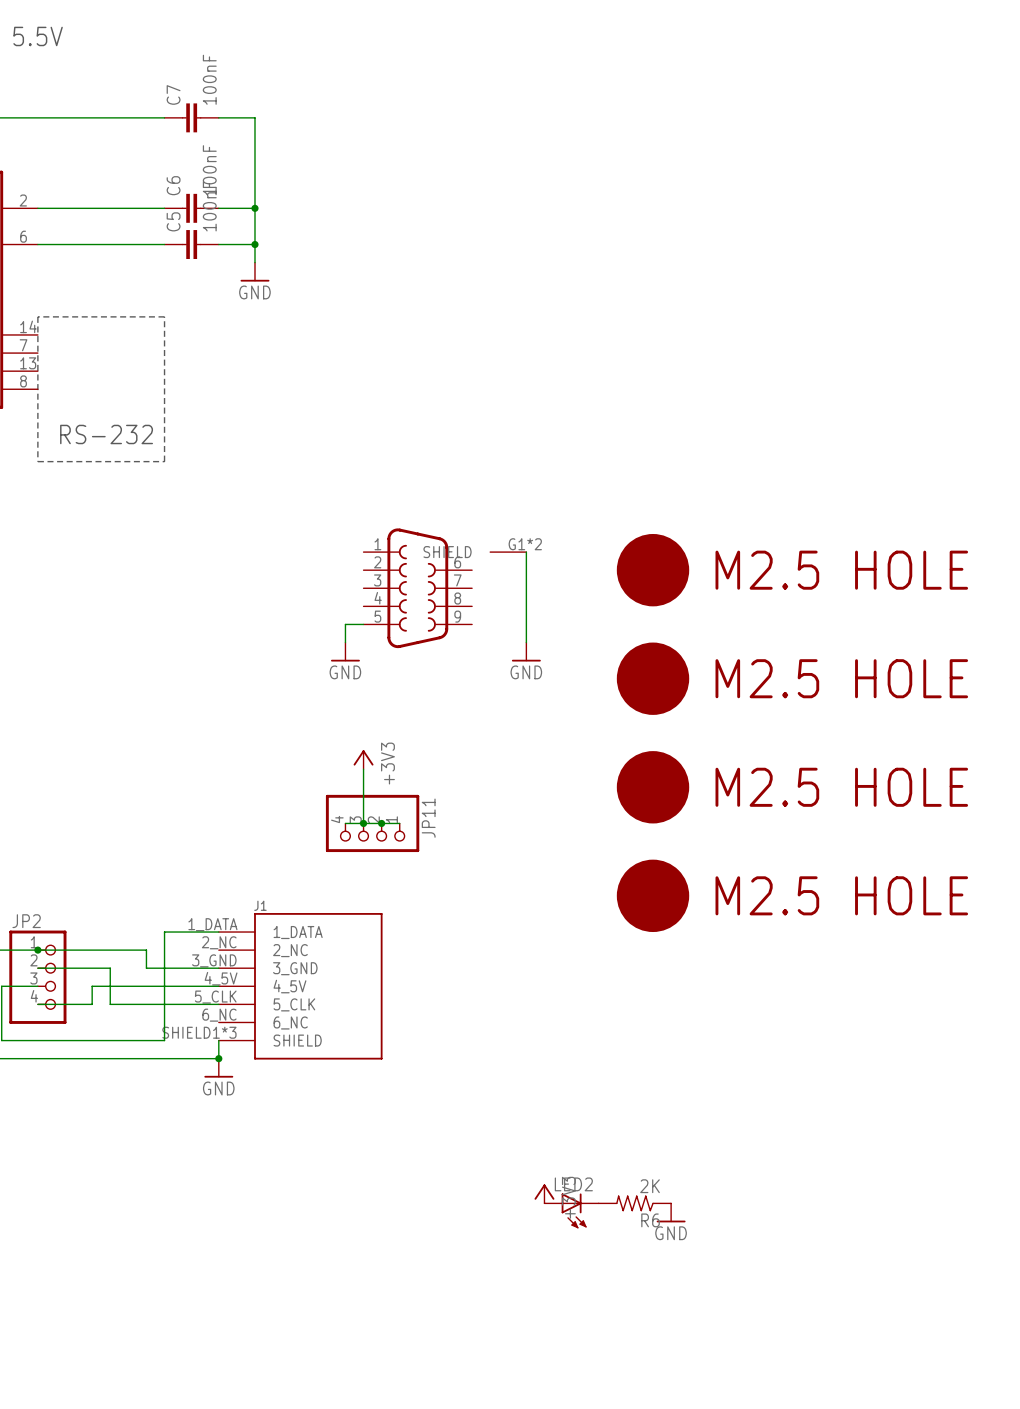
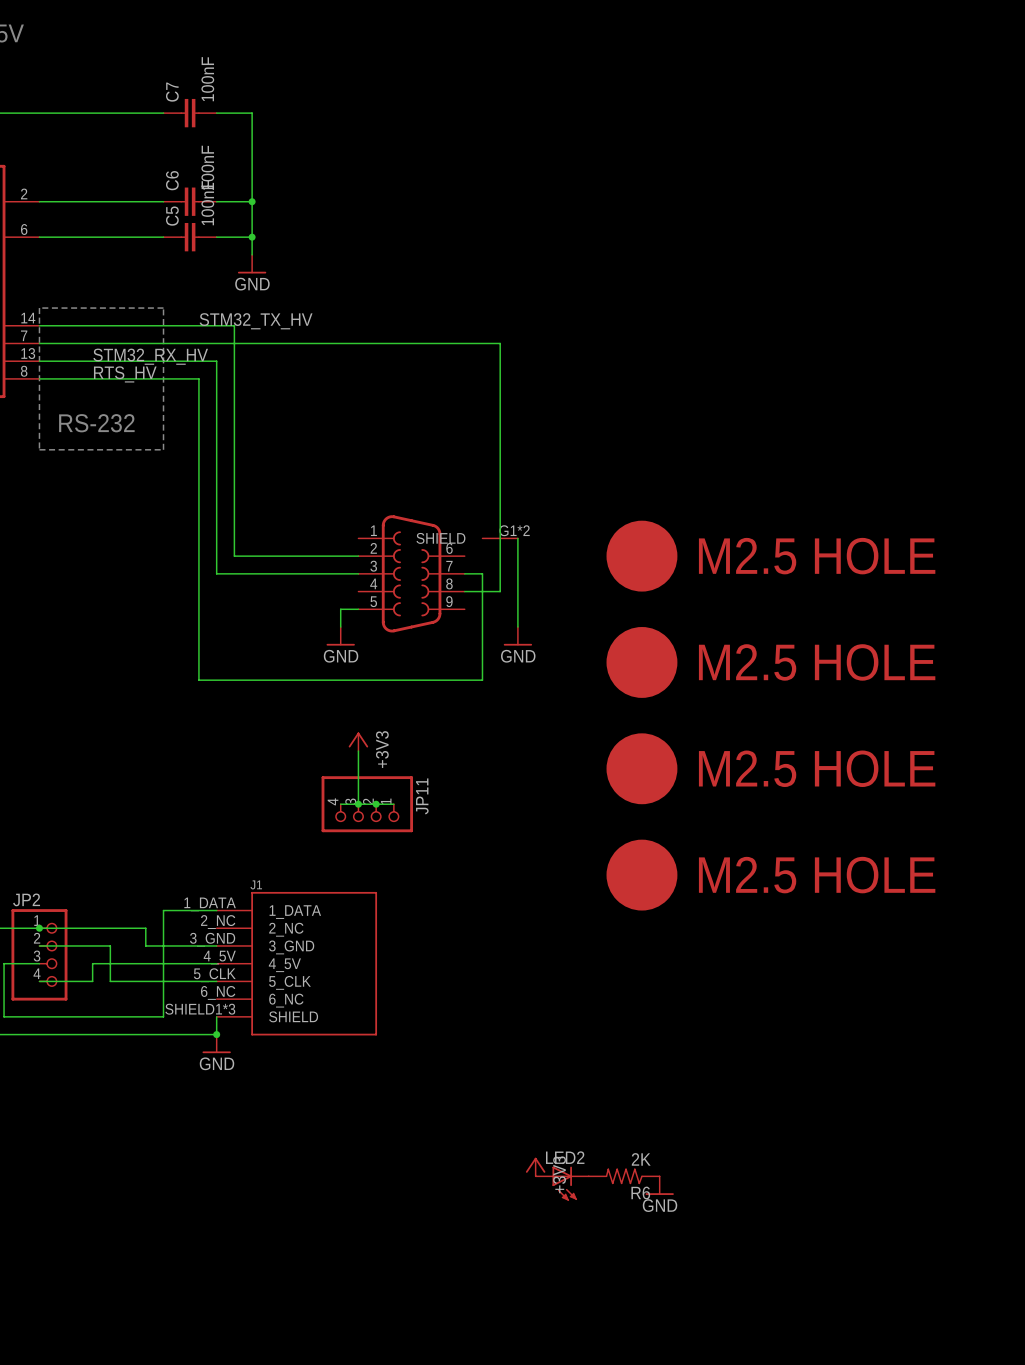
label: none -> STM32_TX_HV (256, 321)
wire: none -> (39, 325) (234, 325) (234, 556) (358, 556)
wire: none -> (39, 343) (500, 343) (500, 591) (464, 591)
label: none -> STM32_RX_HV (150, 356)
wire: none -> (39, 361) (216, 361) (216, 573) (358, 573)
label: none -> RTS_HV (125, 374)
wire: none -> (39, 378) (198, 378) (198, 680) (482, 680) (482, 573) (464, 573)

